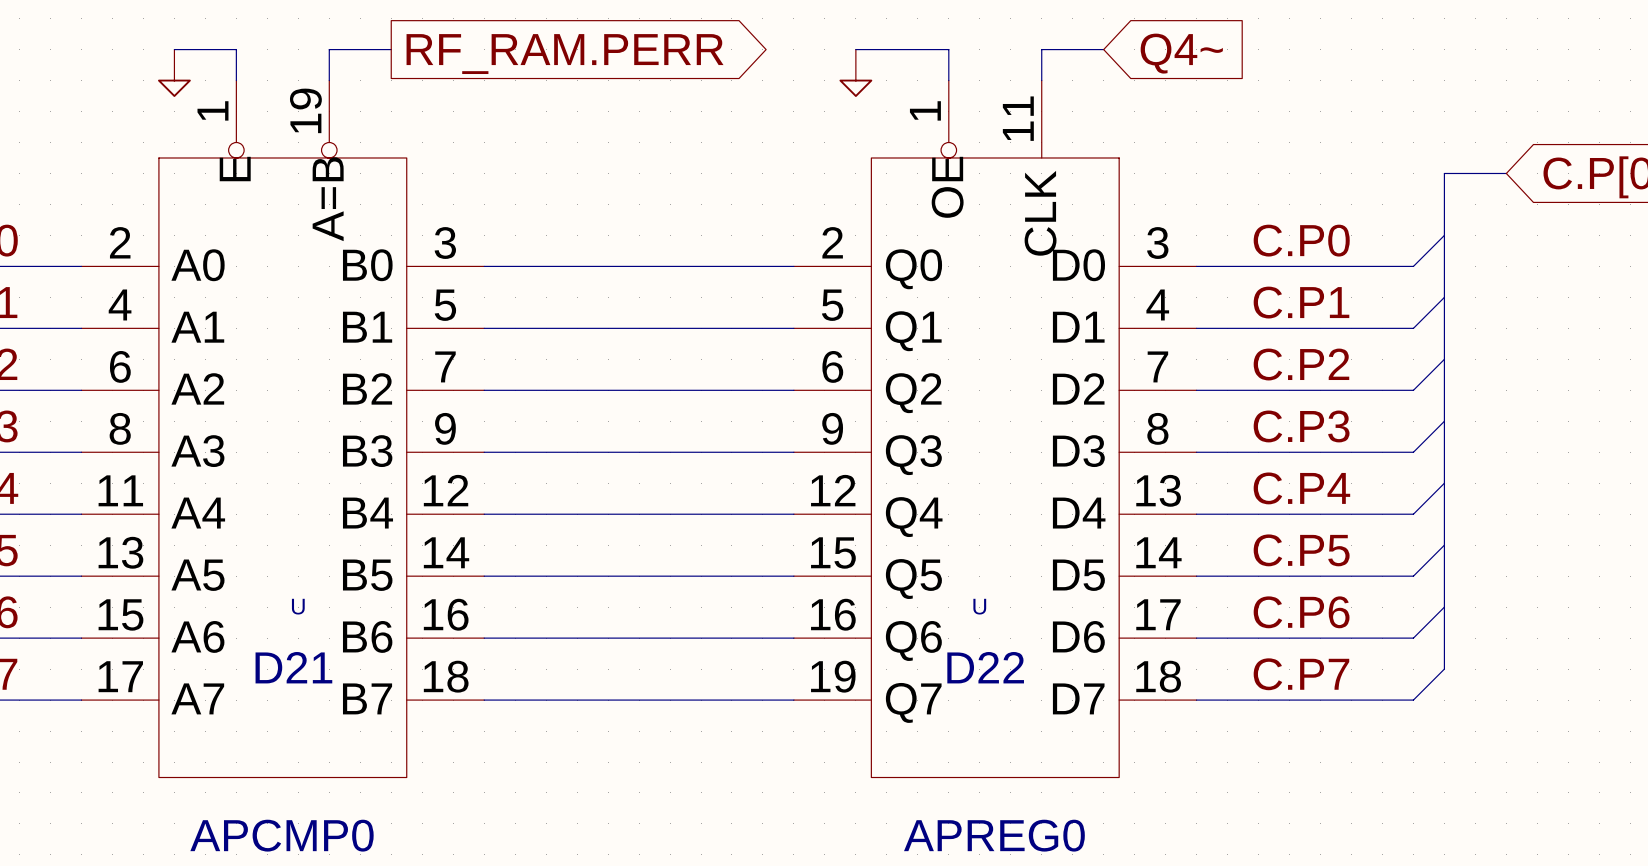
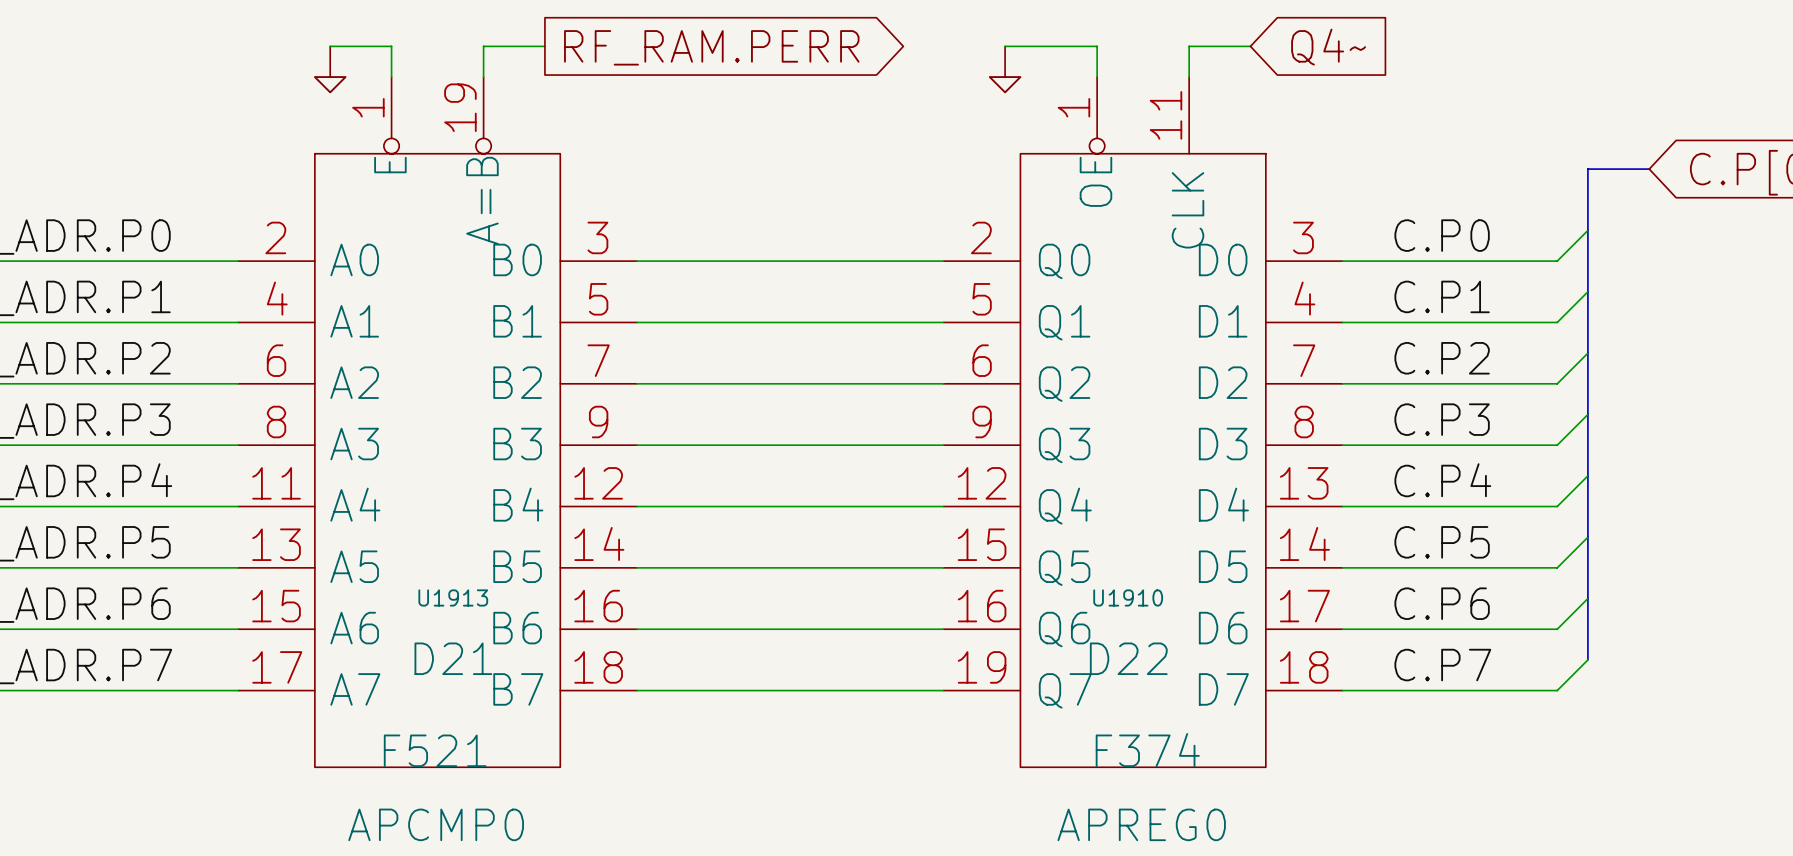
U name: U (298, 606) -> U1913 (453, 597)
U name: U (979, 606) -> U1910 (1128, 597)
U value: none -> F521 (435, 750)
U value: none -> F374 (1147, 750)

